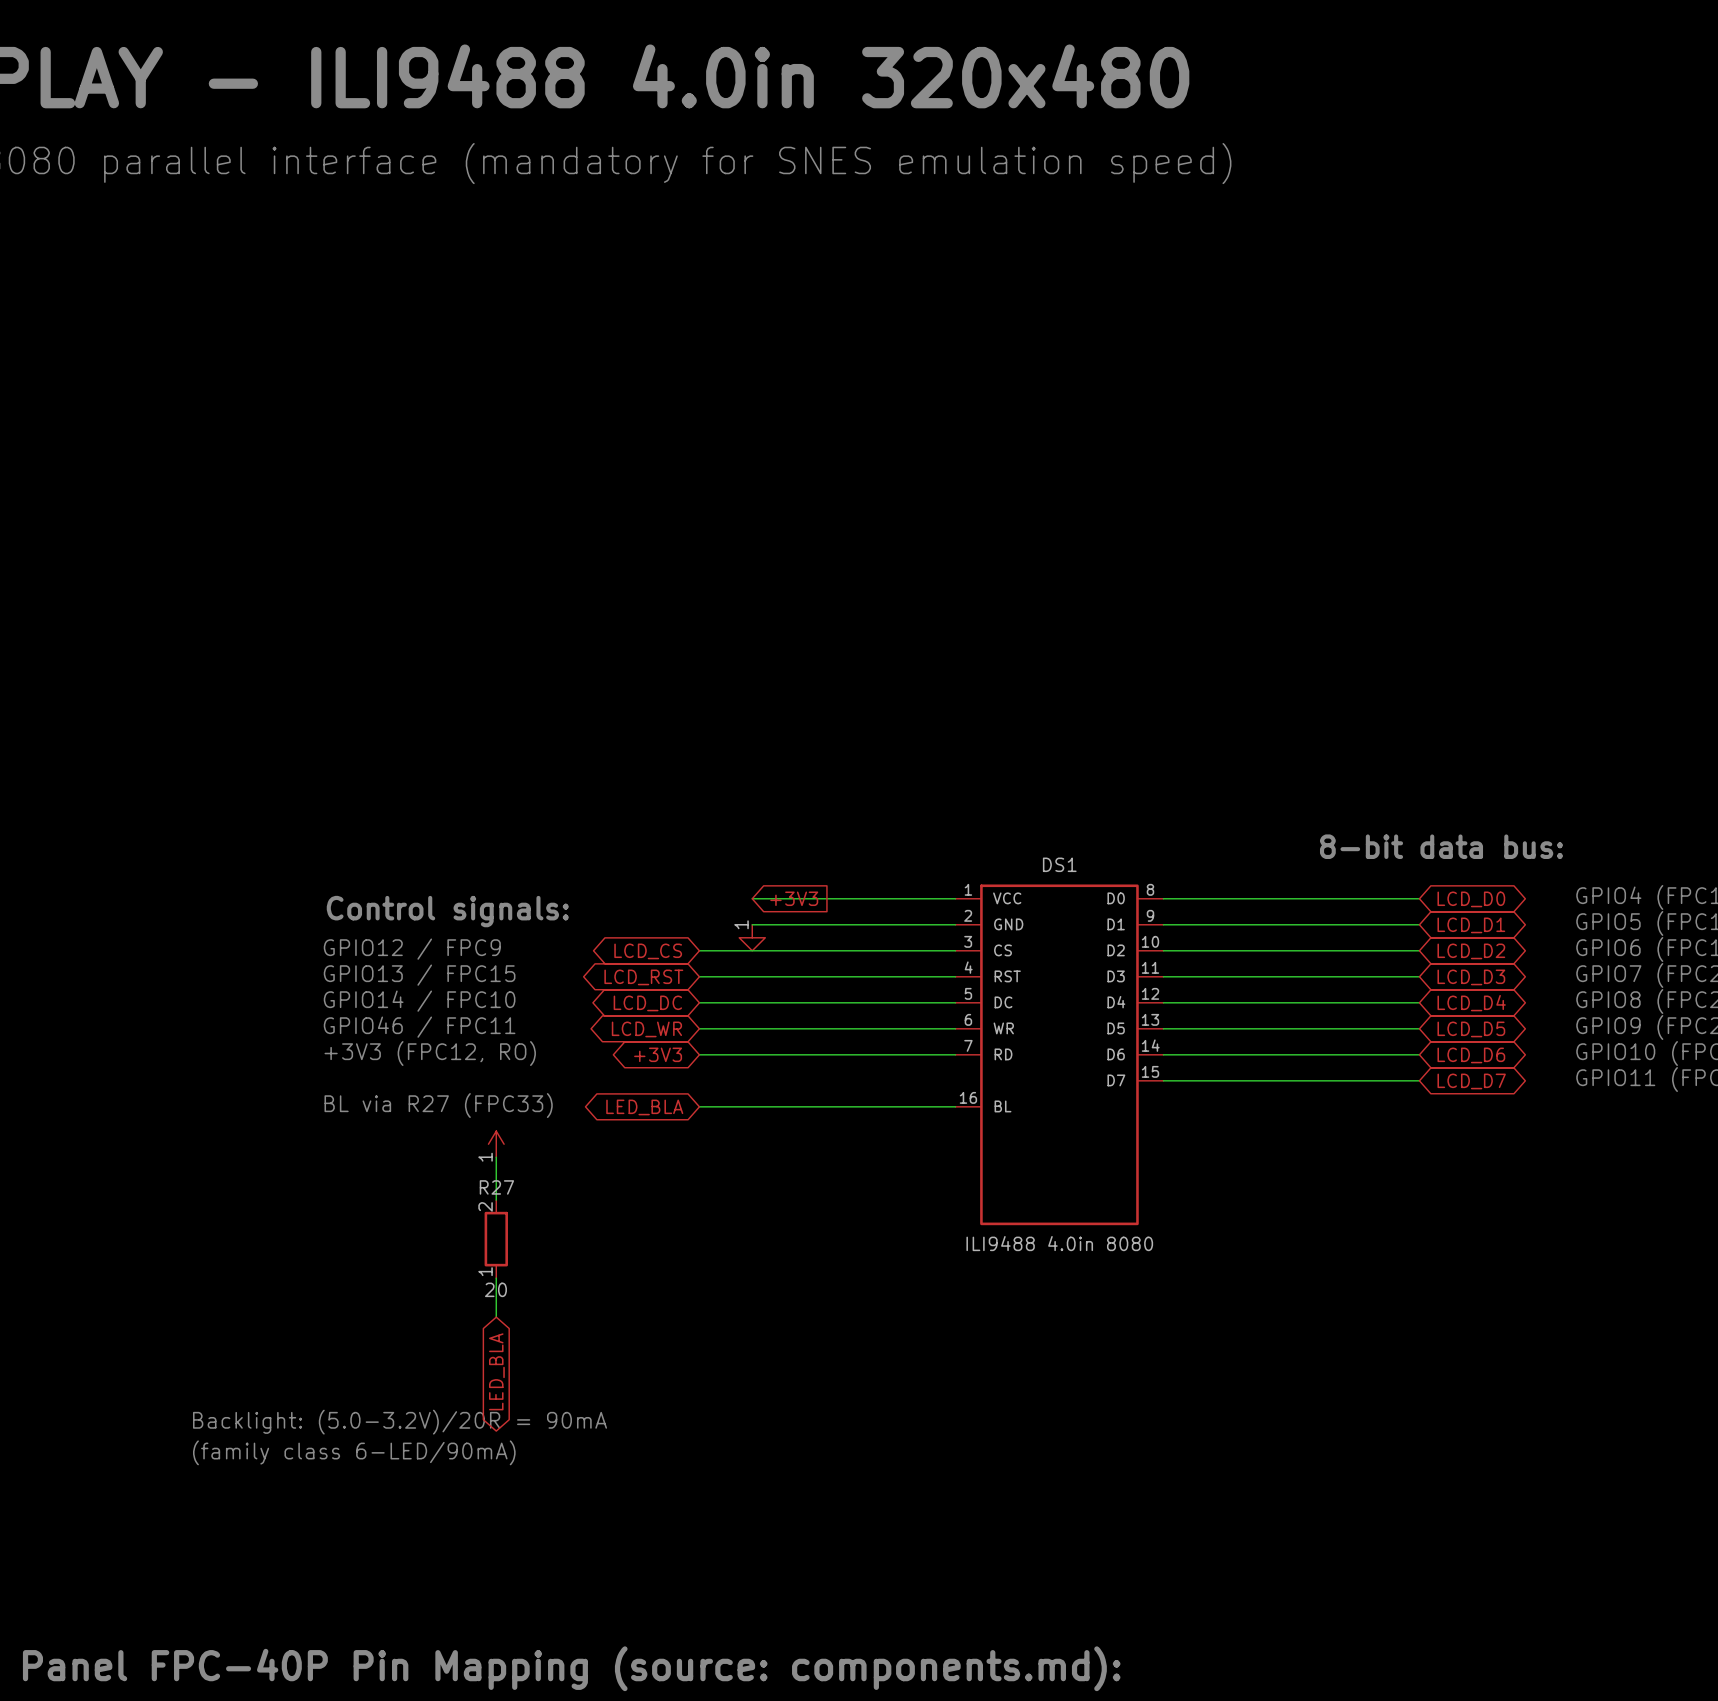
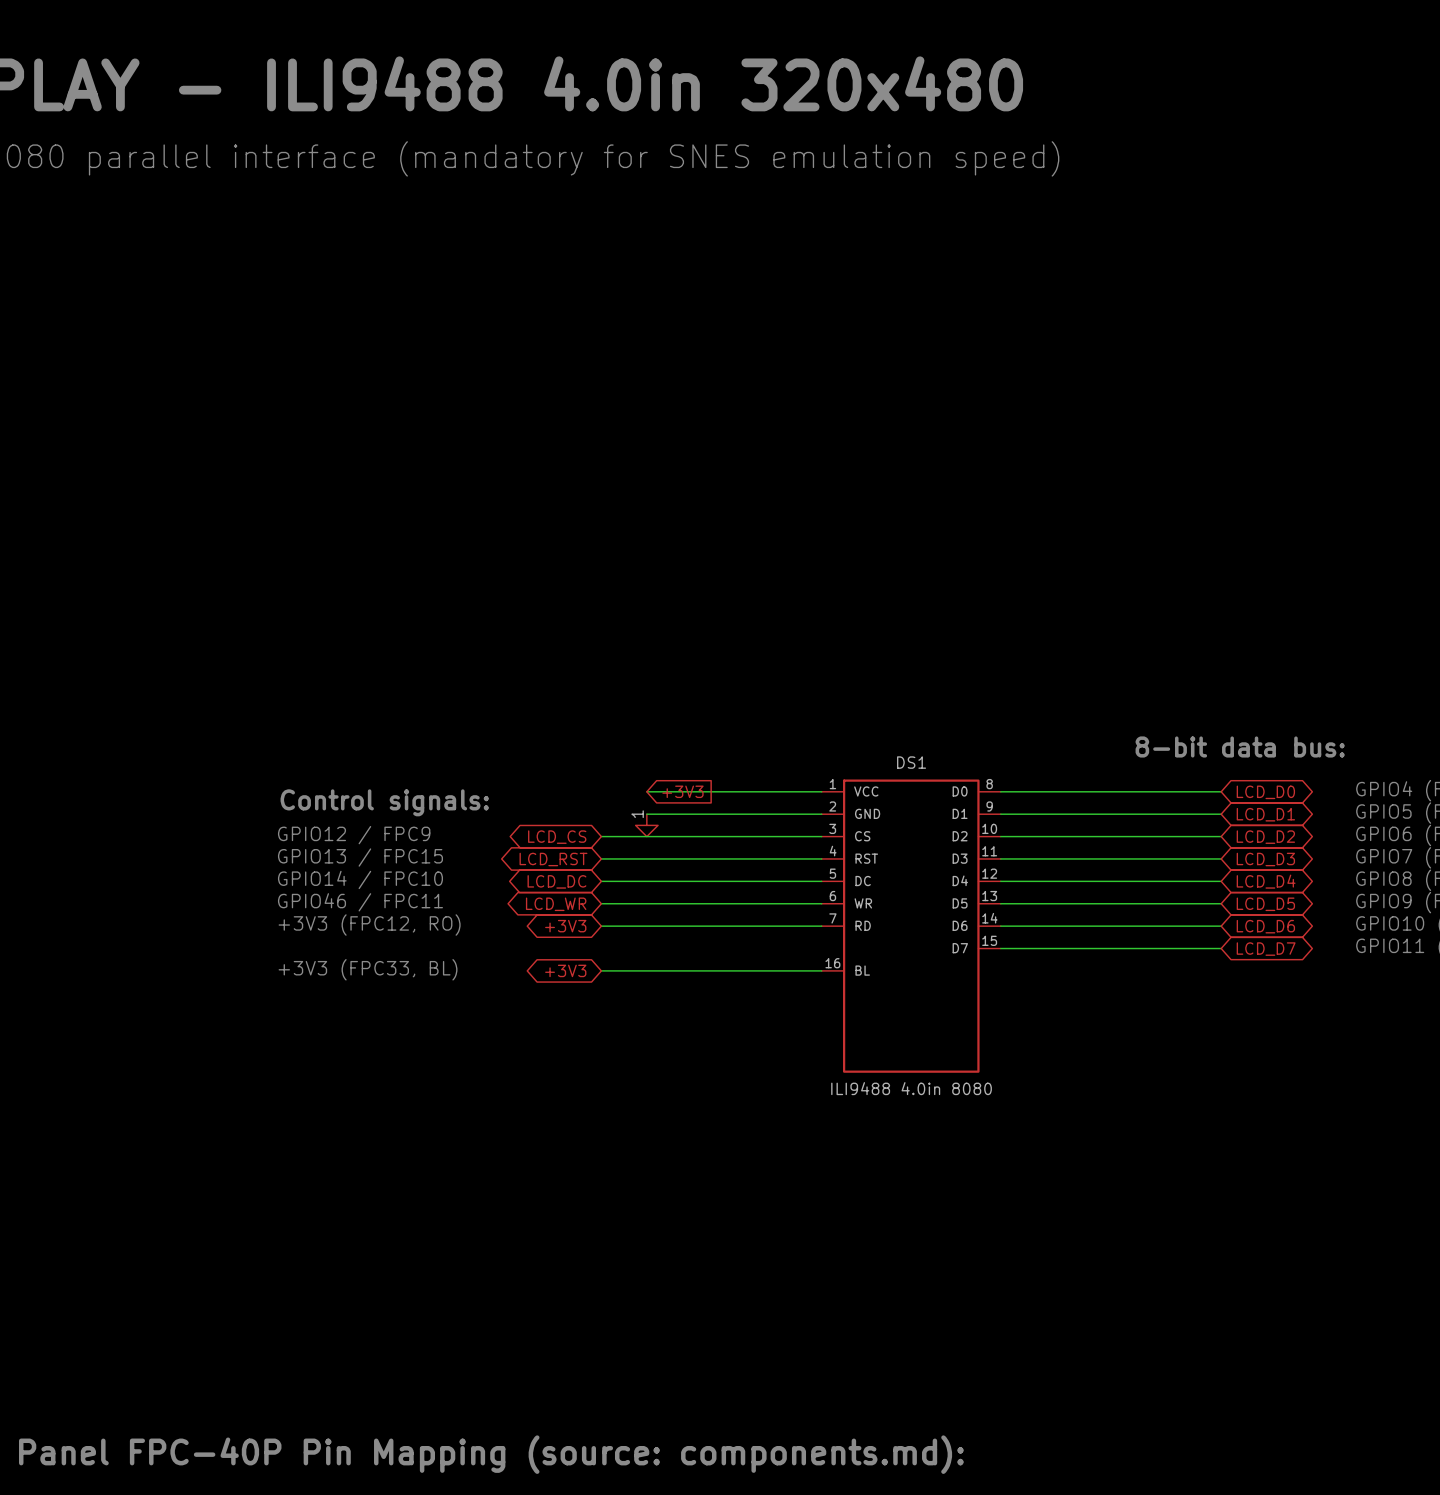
text: BL via R27 (FPC33) (438, 1105) -> +3V3 (FPC33, BL) (368, 969)
global label: LED_BLA (644, 1107) -> +3V3 (565, 970)
power symbol: (496, 1144) -> none
wire: (496, 1157) (496, 1200) -> none
R27: 20 (496, 1239) -> none
wire: (496, 1278) (496, 1317) -> none
global label: LED_BLA (496, 1371) -> none
text: Backlight: (5.0-3.2V)/20R = 90mA (400, 1422) -> none
text: (family class 6-LED/90mA) (354, 1452) -> none

